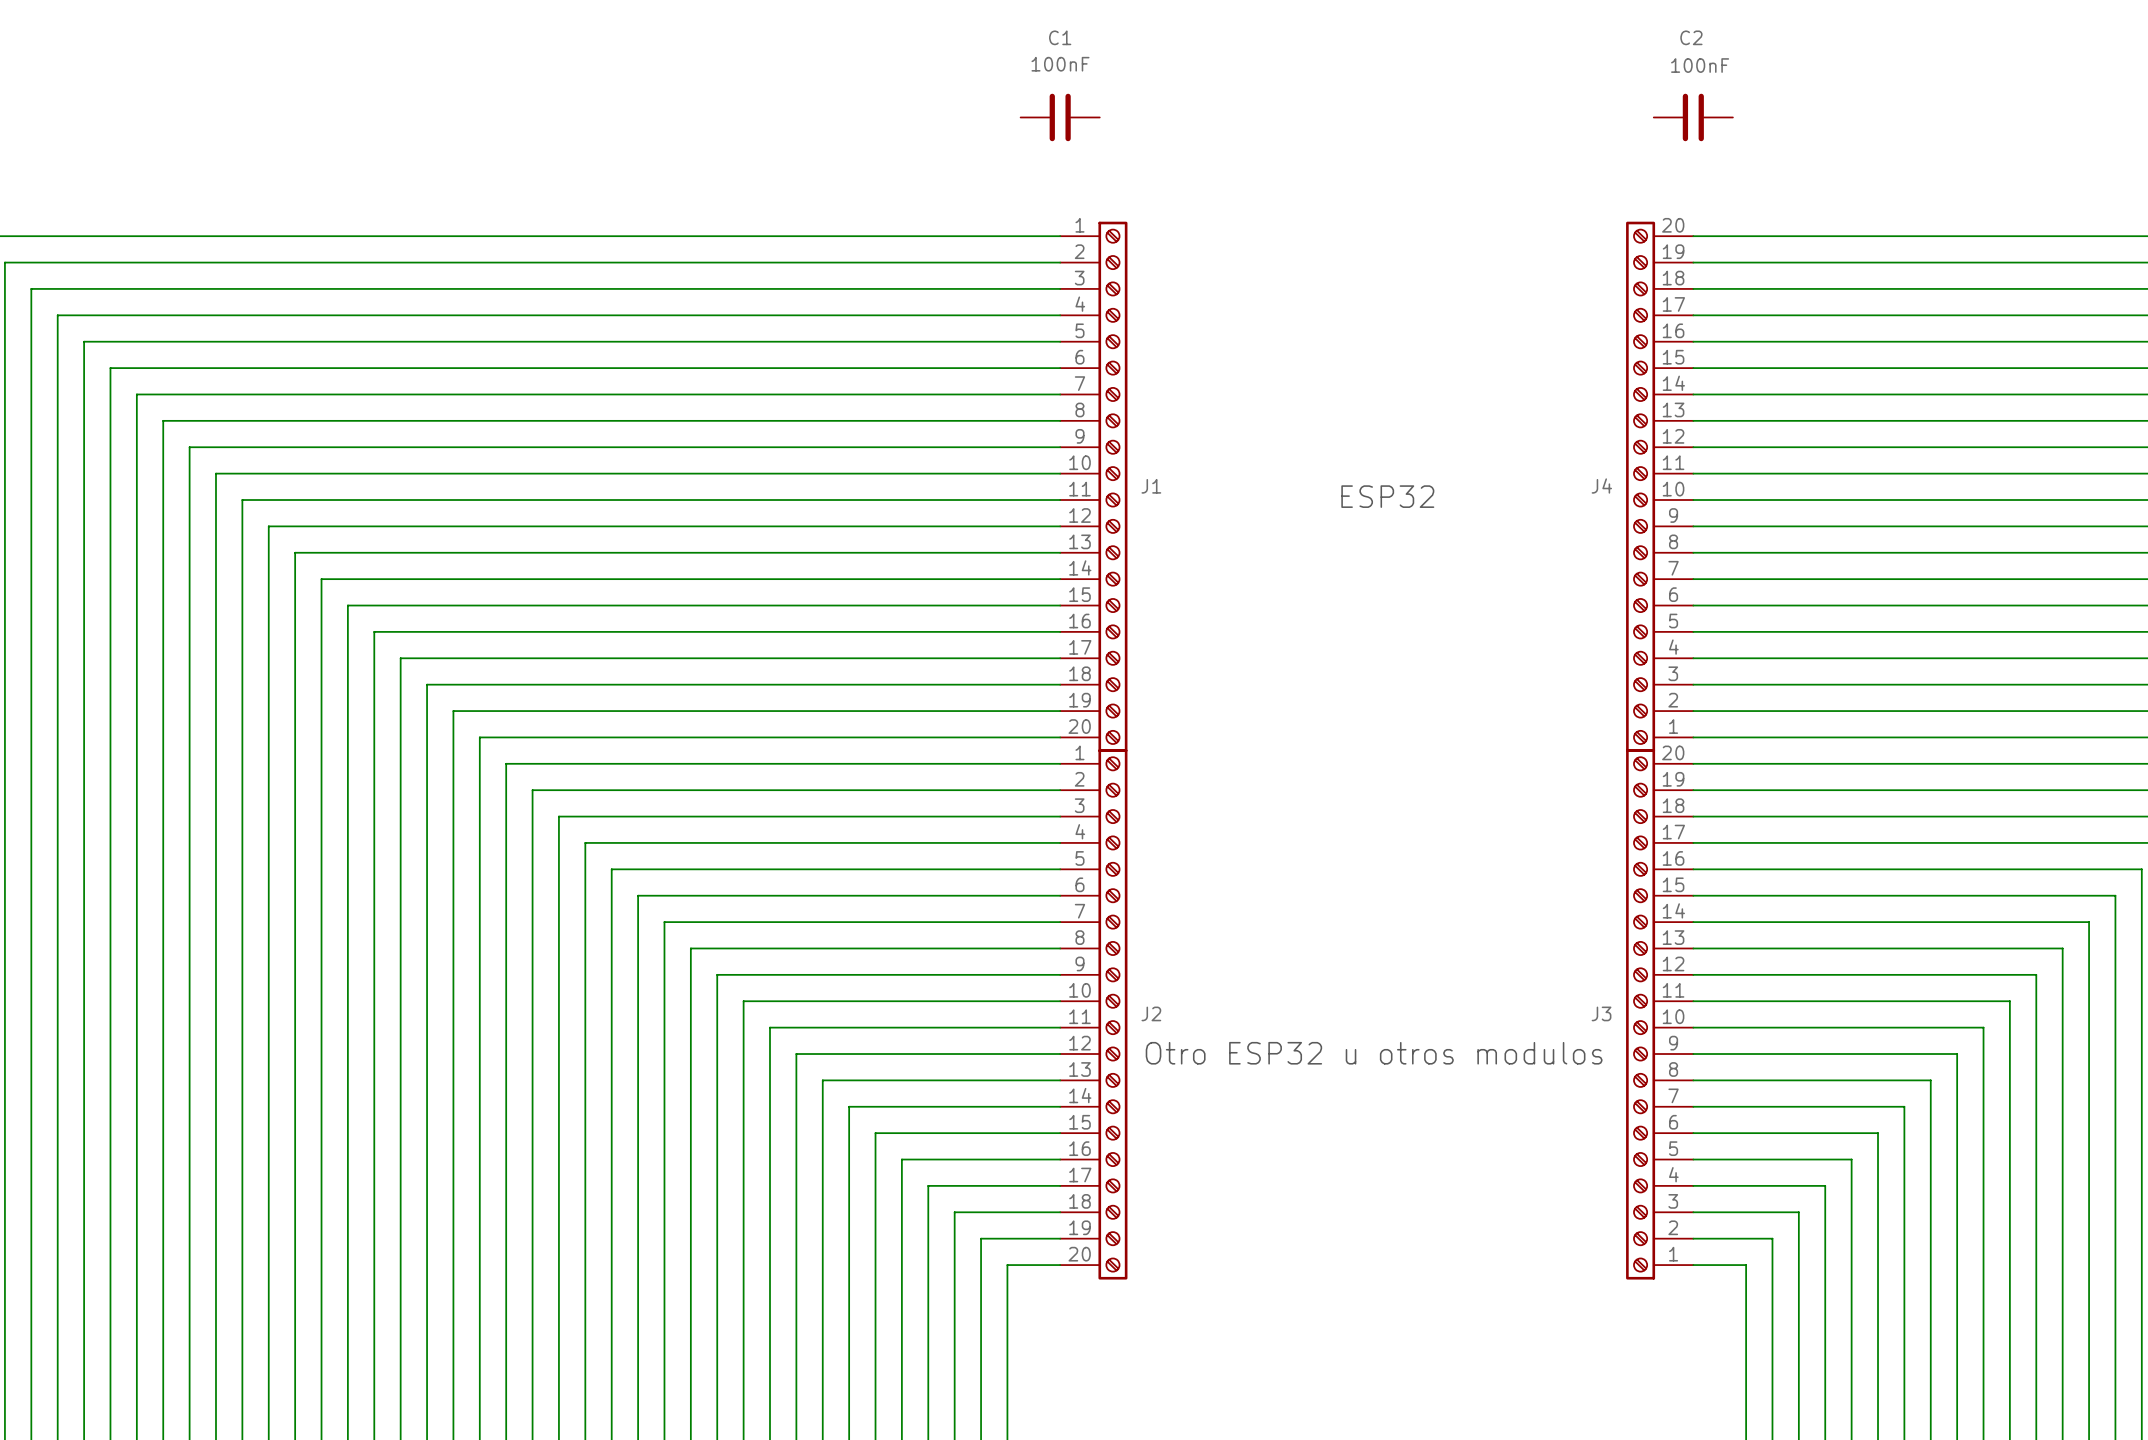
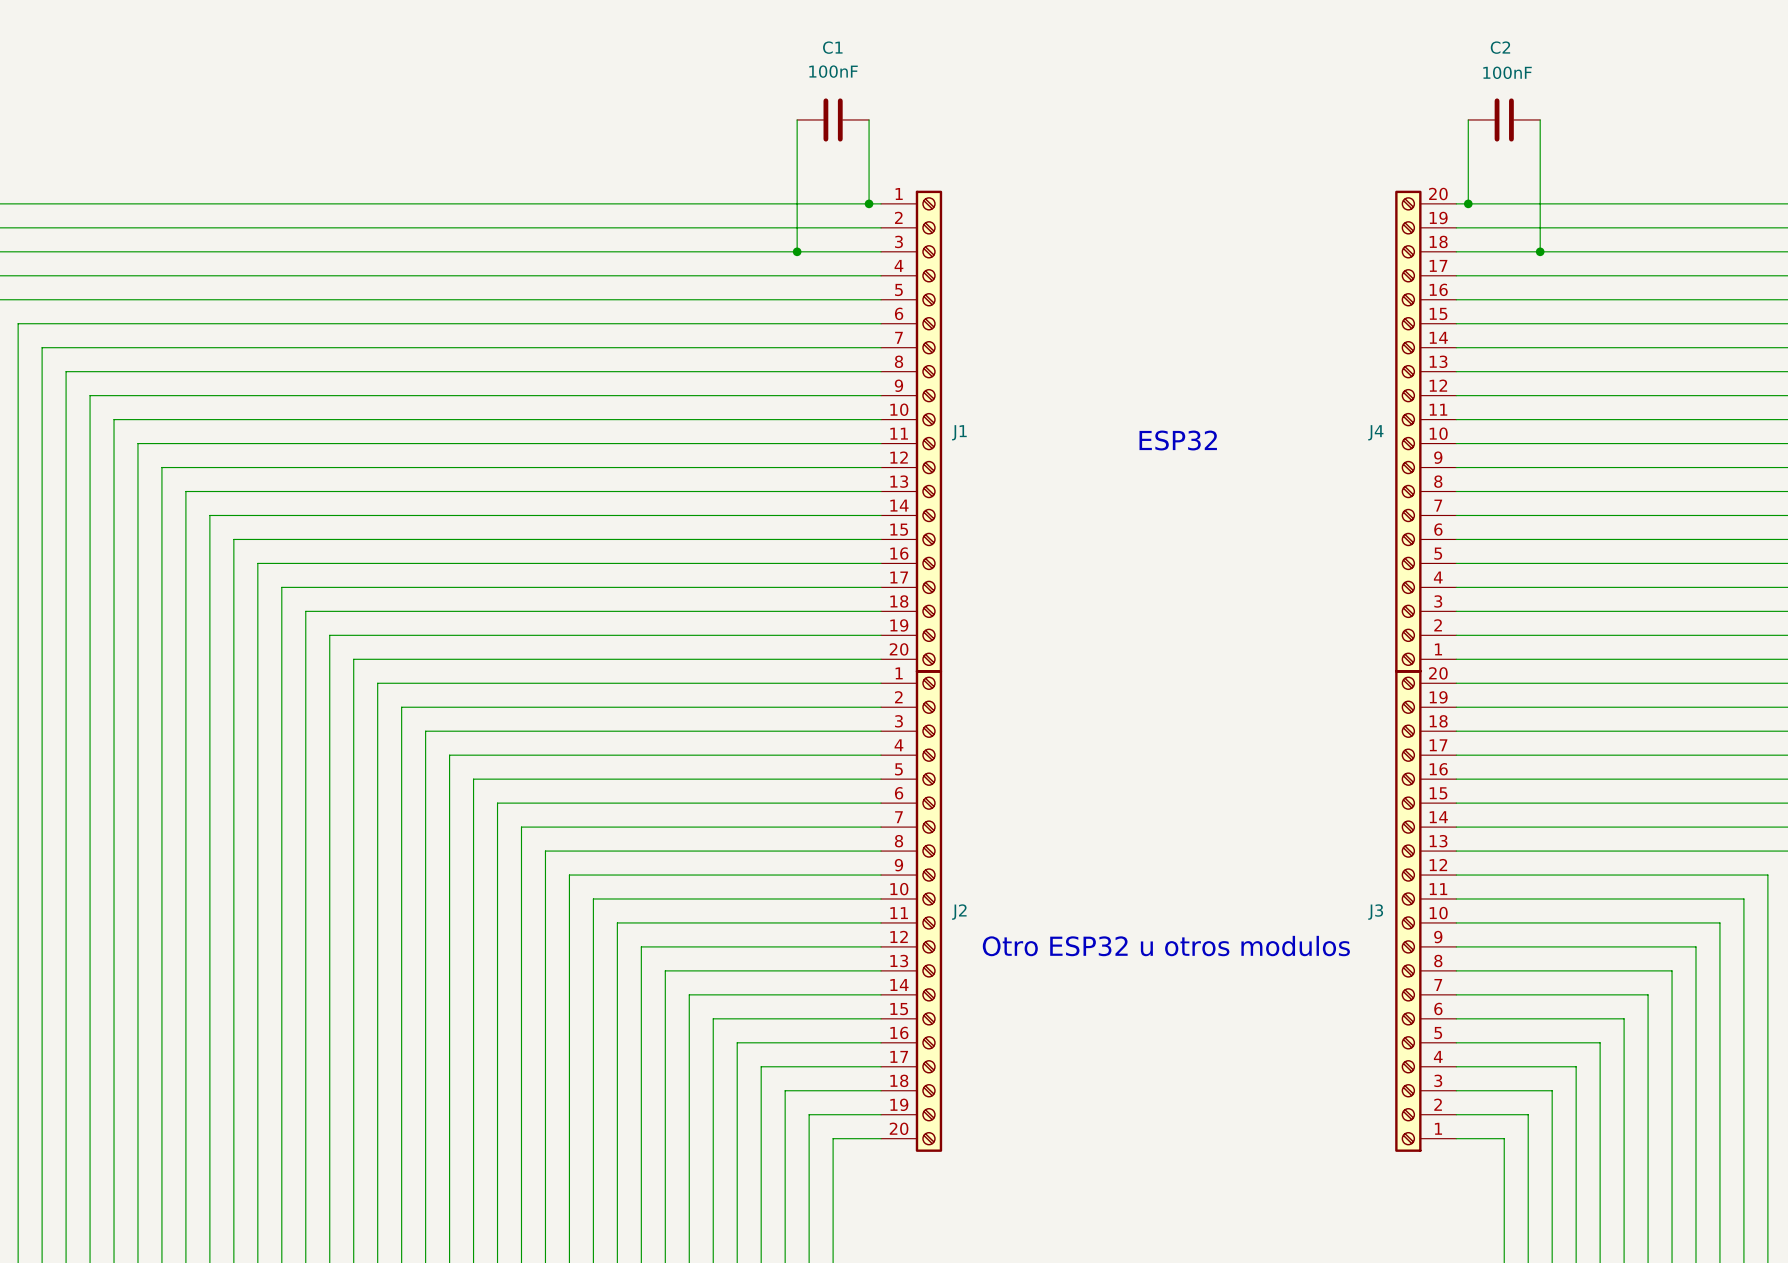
C1 position: (1060, 117) -> (833, 119)
C2 position: (1693, 117) -> (1504, 119)
wire: none -> (797, 119) (797, 251)
wire: none -> (869, 119) (869, 203)
wire: none -> (1468, 119) (1468, 203)
wire: none -> (1540, 119) (1540, 251)
junction: none -> (869, 203)
junction: none -> (1468, 203)
junction: none -> (797, 251)
junction: none -> (1540, 251)

